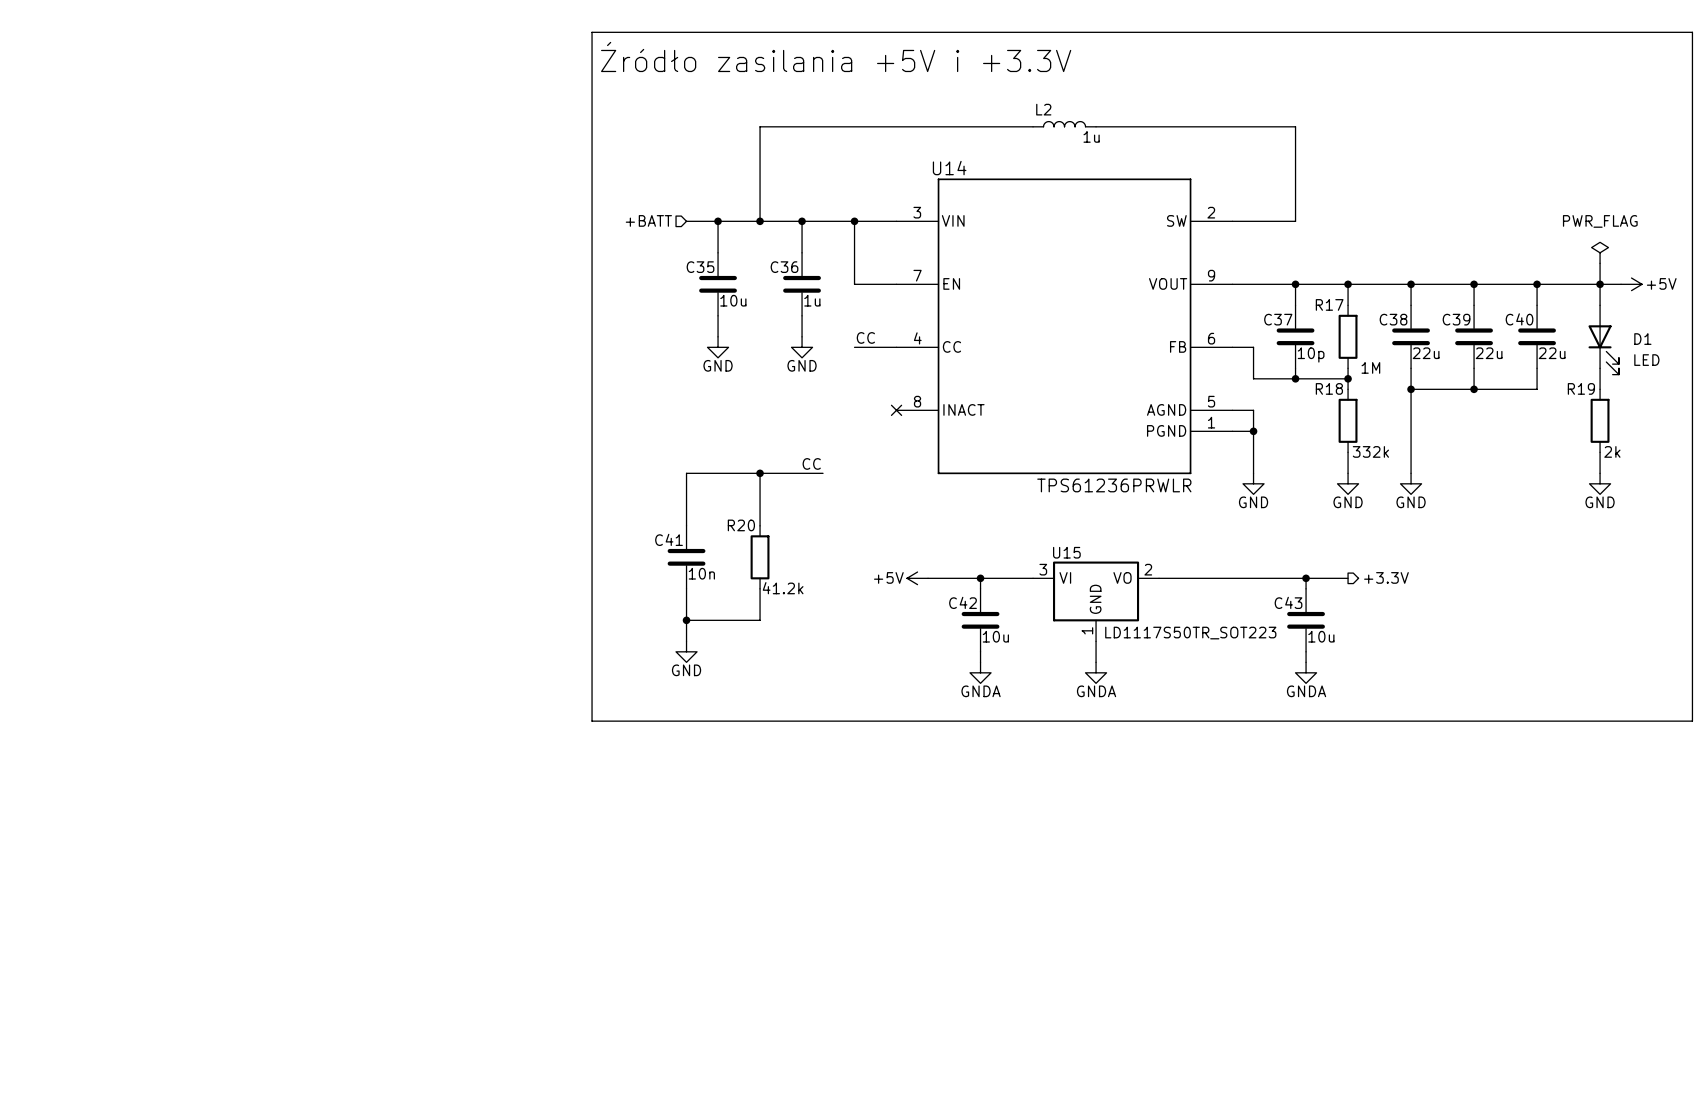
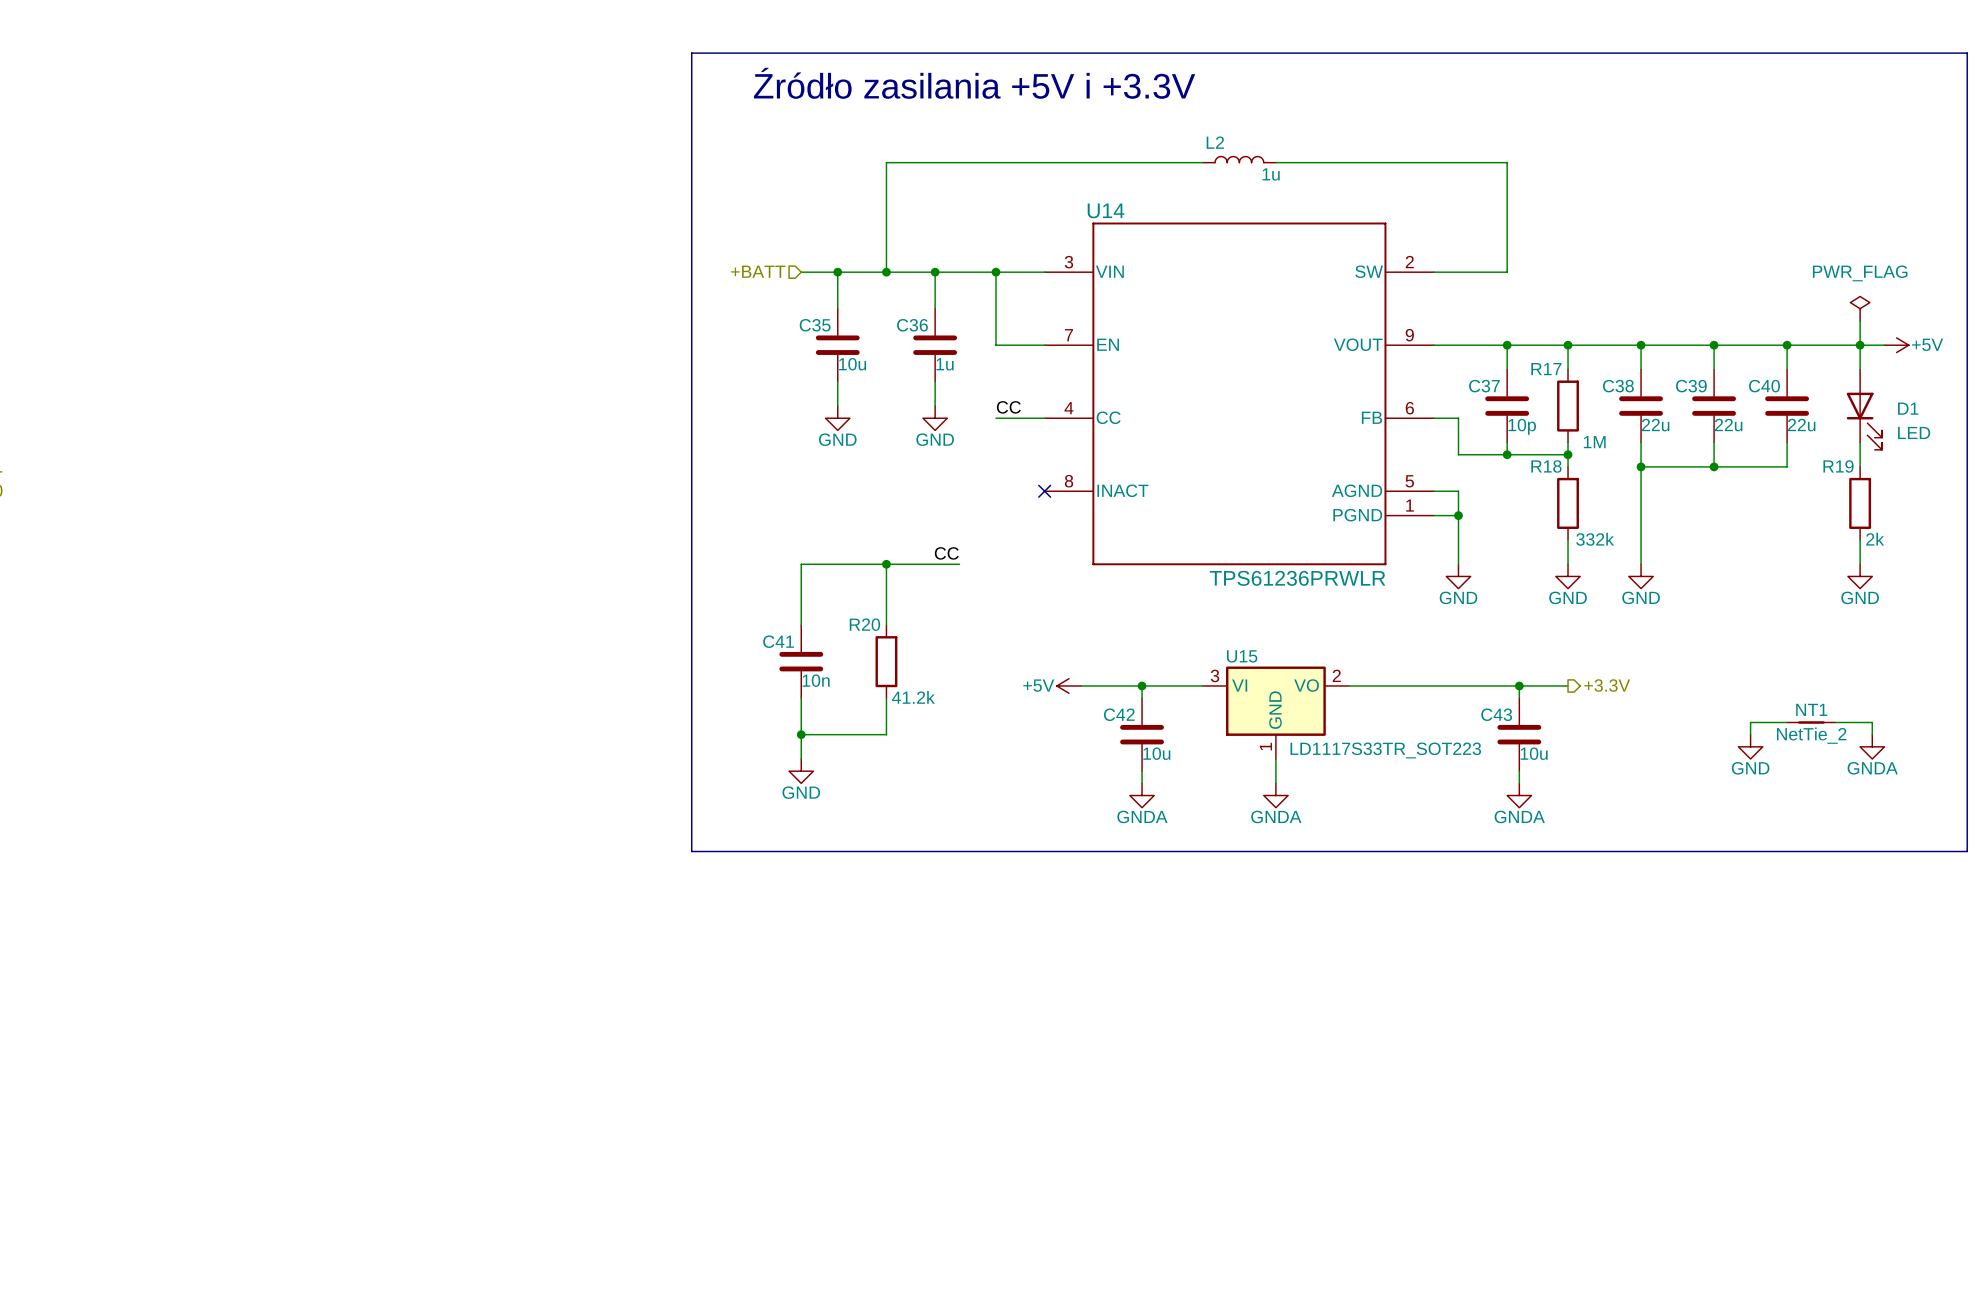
wire: none -> (1787, 722) (1750, 722) (1750, 734)
NT1: none -> NetTie_2 (1811, 722)
wire: none -> (1835, 722) (1872, 722) (1872, 734)
power symbol: none -> GND (1750, 746)
power symbol: none -> GNDA (1872, 746)
U15 value: LD1117S50TR_SOT223 (1190, 633) -> LD1117S33TR_SOT223 (1385, 750)

